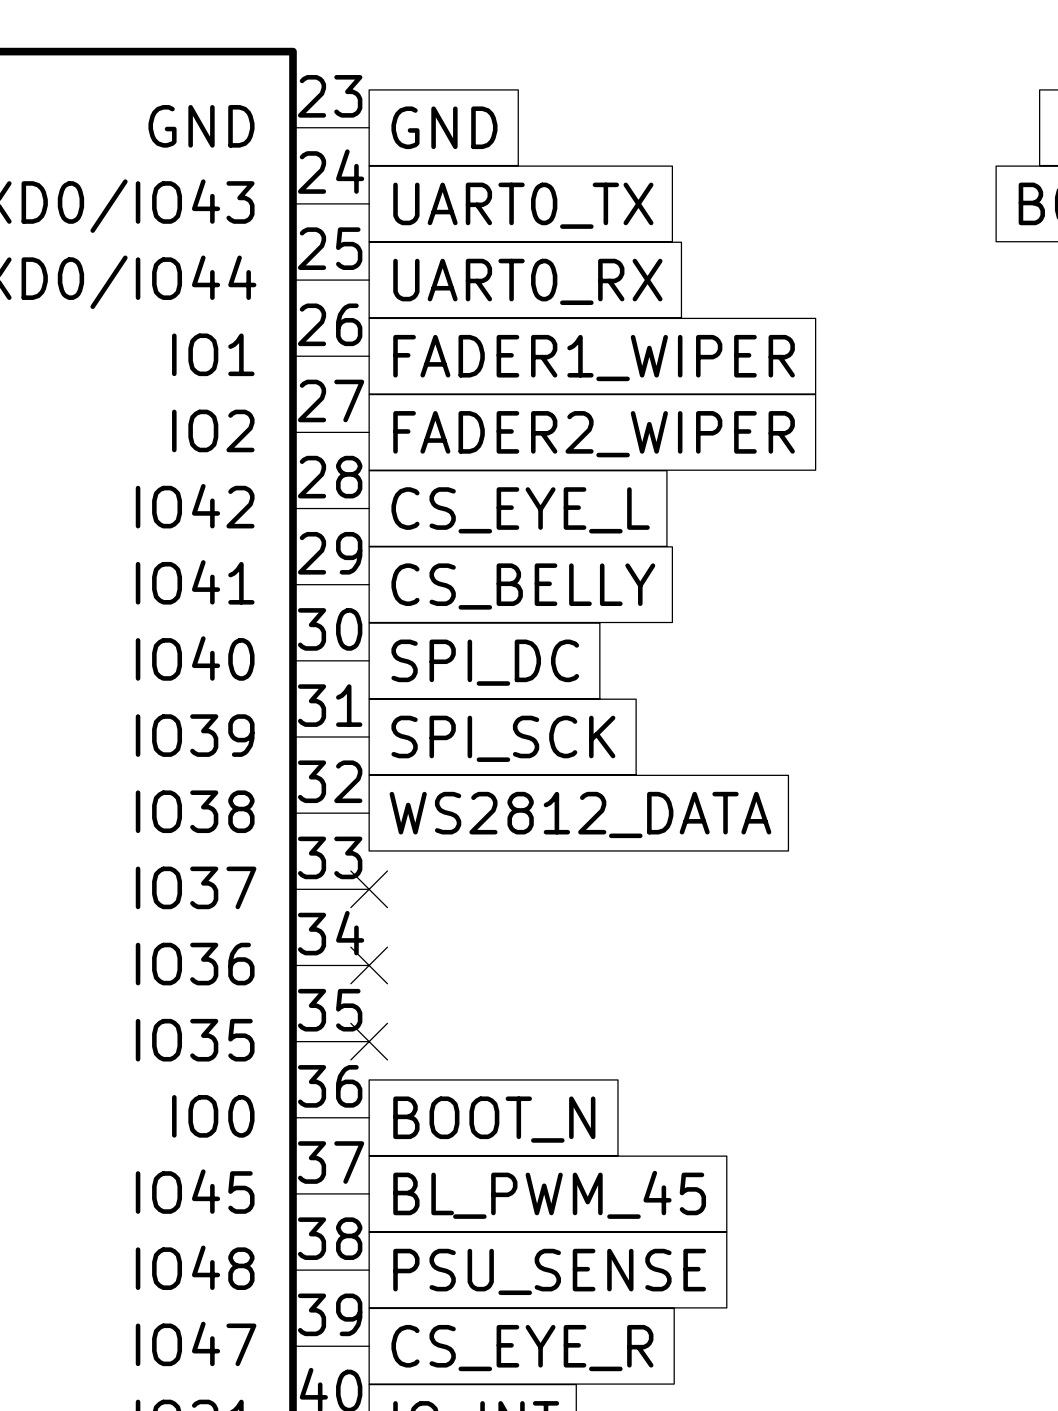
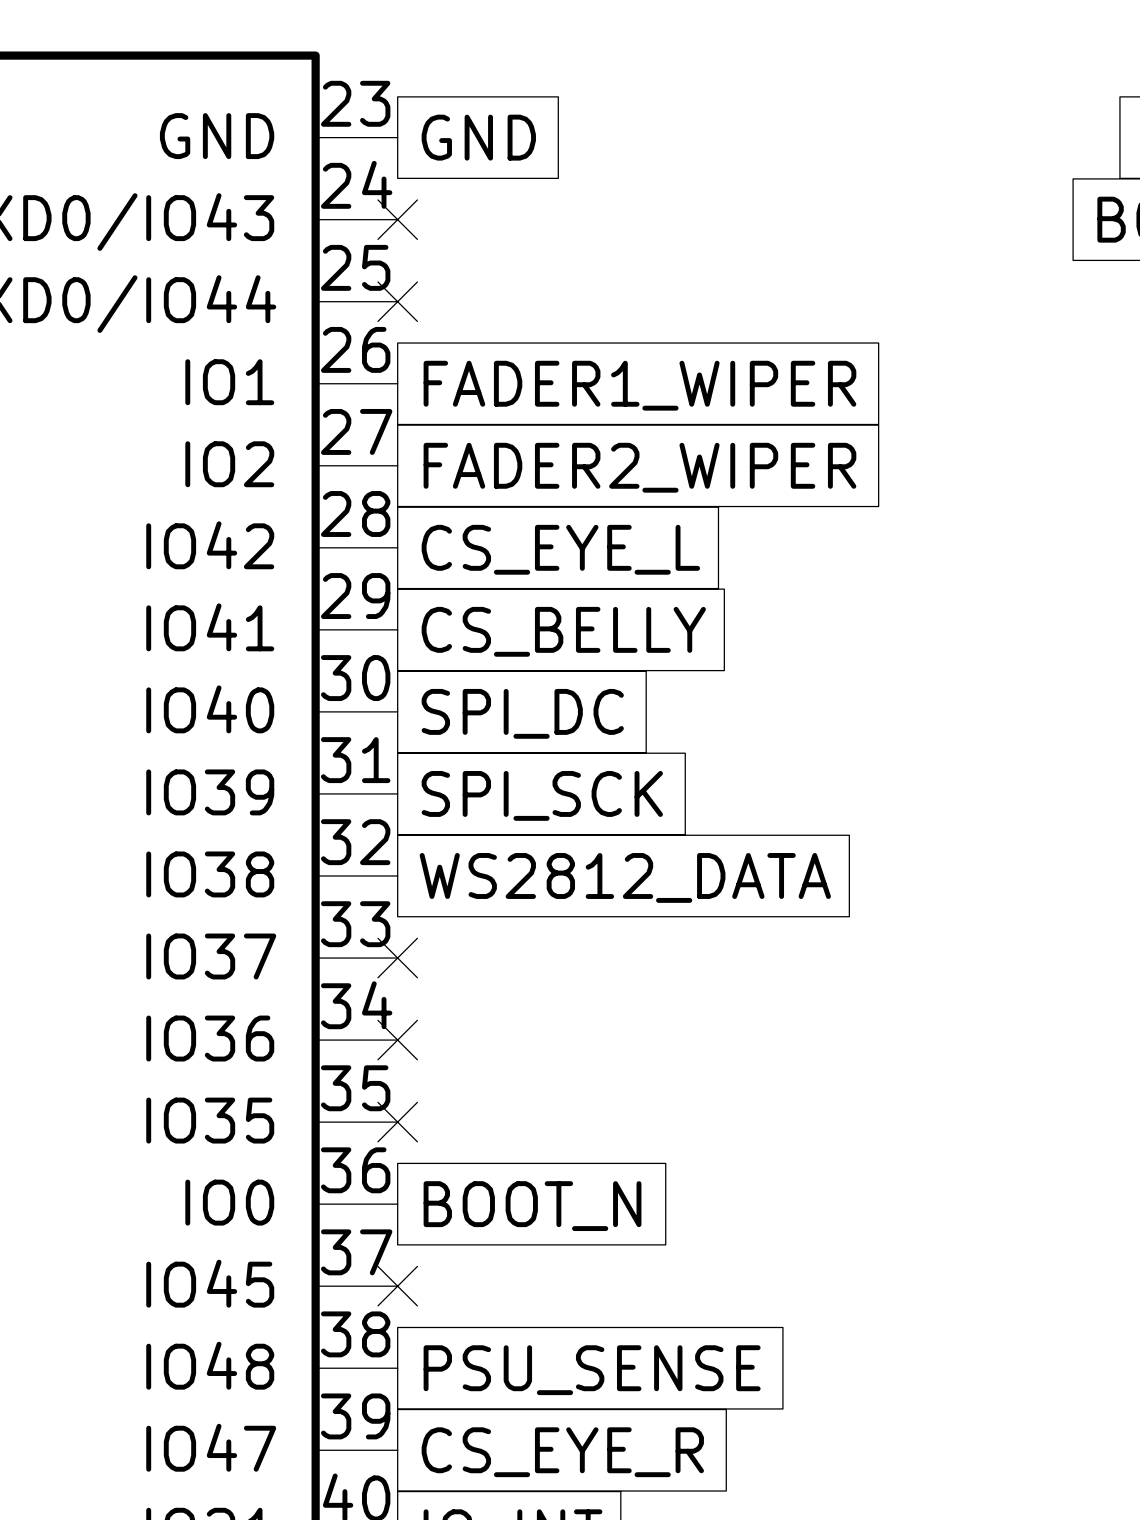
no-connect mark: none -> (397, 219)
global label: UART0_TX (523, 205) -> none
no-connect mark: none -> (397, 301)
global label: UART0_RX (527, 281) -> none
no-connect mark: none -> (397, 1286)
global label: BL_PWM_45 (549, 1194) -> none

